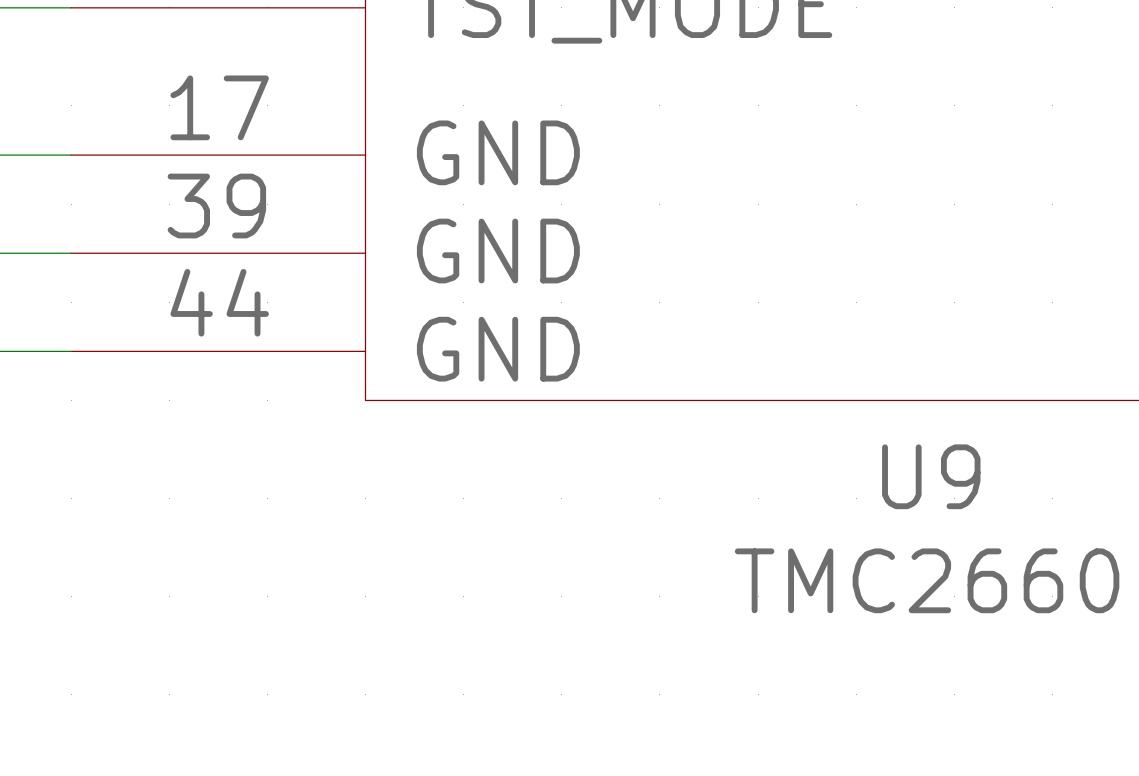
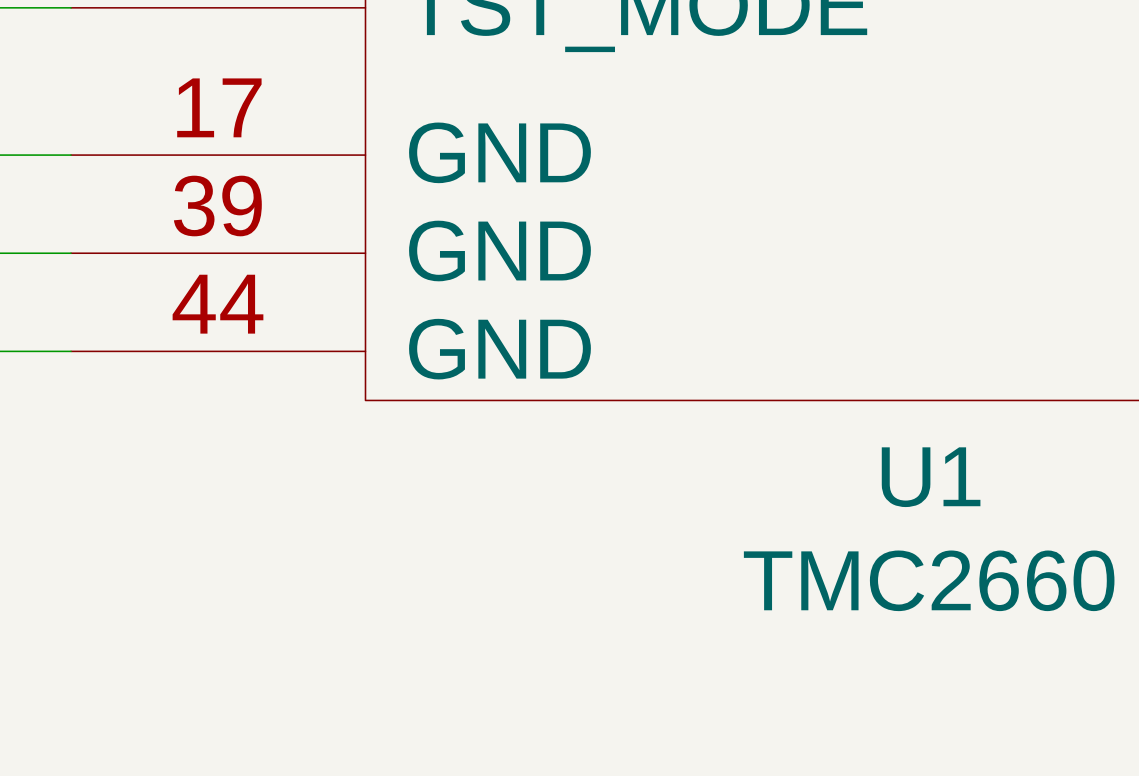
U9 name: U9 (931, 476) -> U1 (931, 477)

